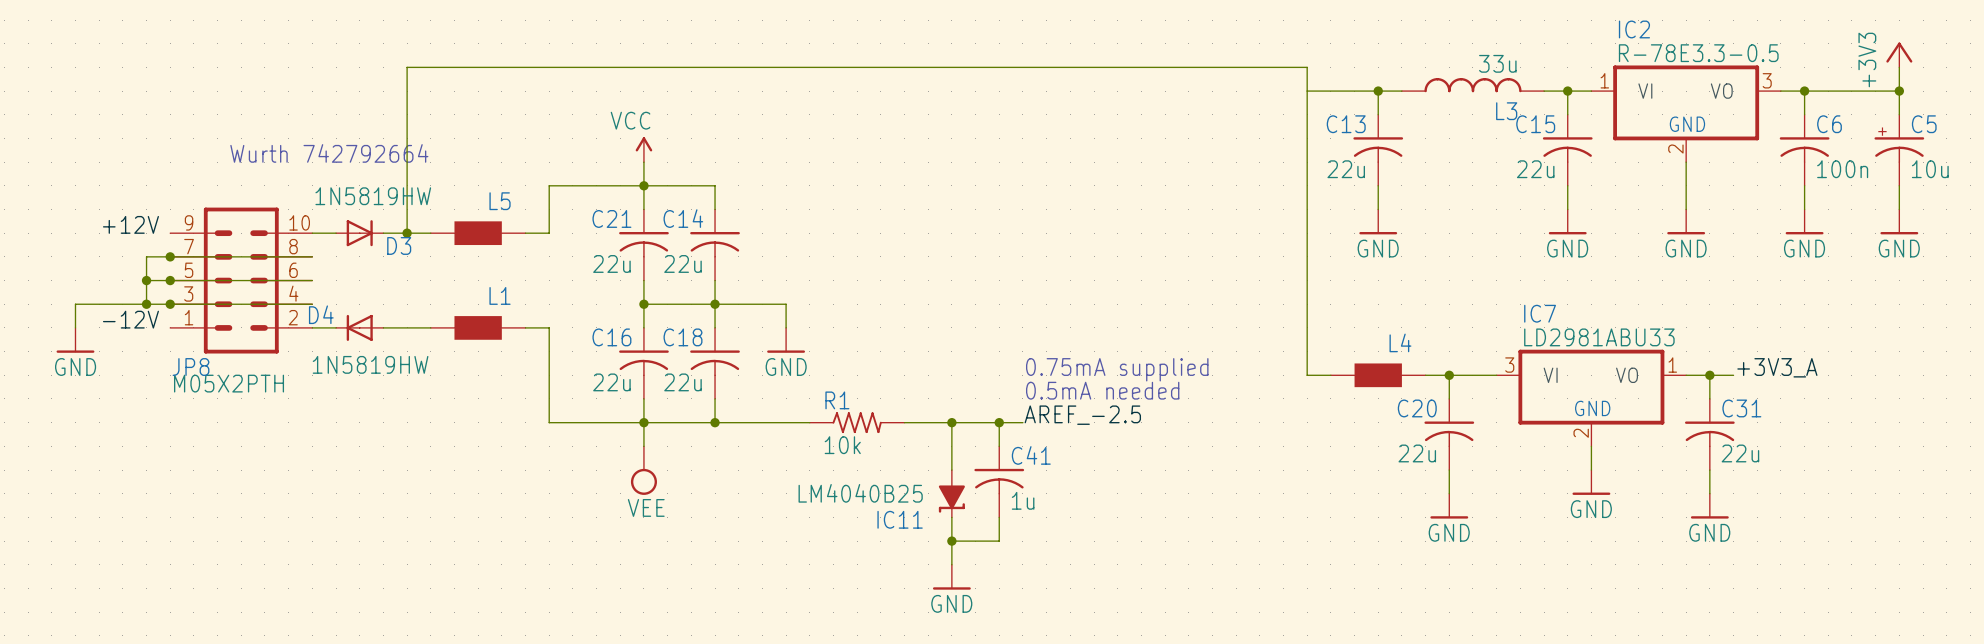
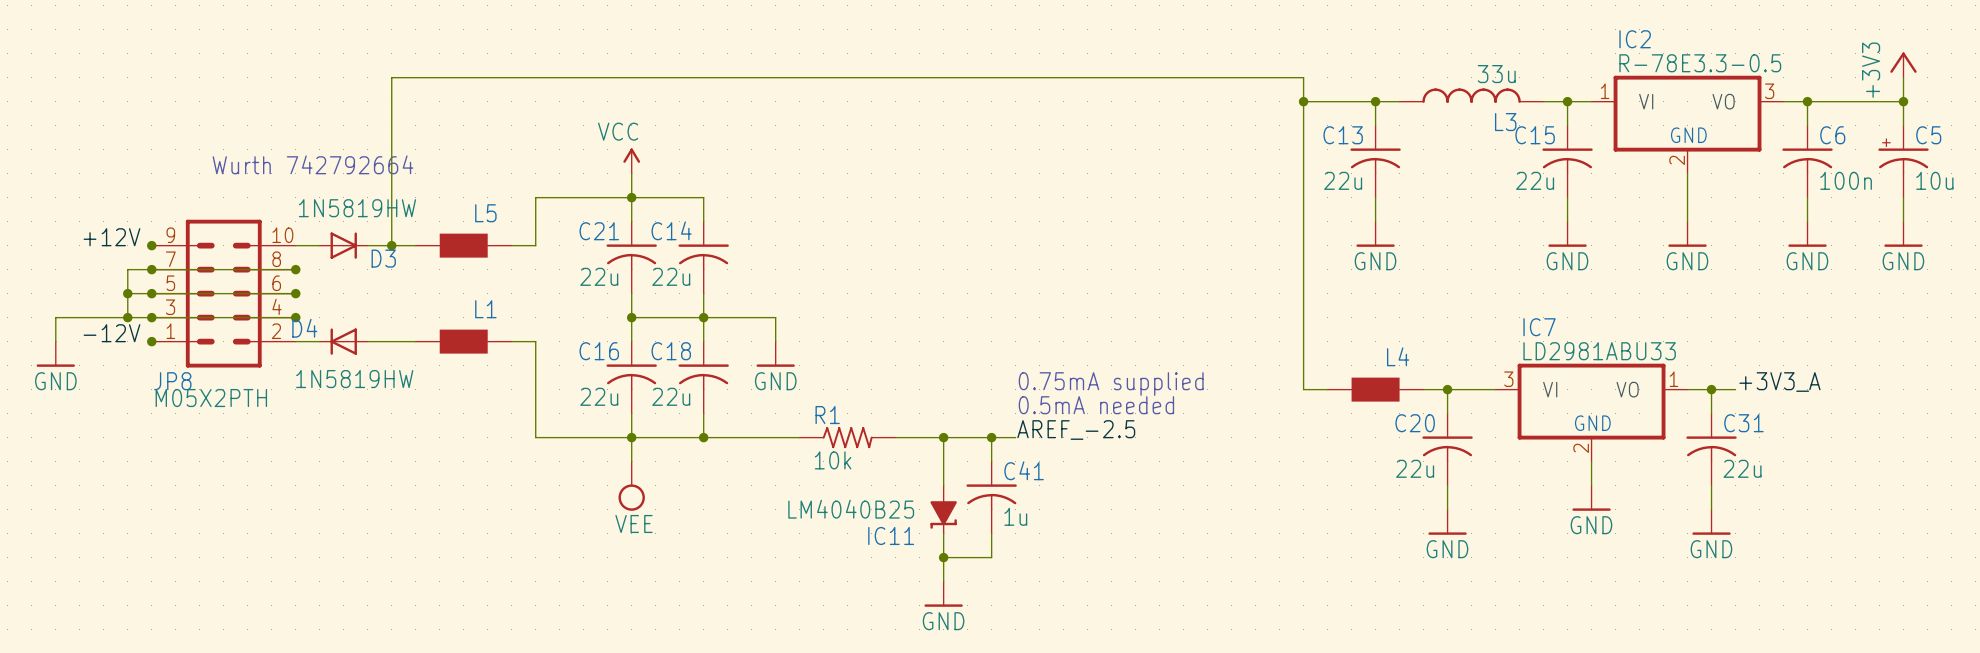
junction: none -> (1303, 101)
junction: none -> (151, 245)
junction: none -> (295, 269)
junction: none -> (295, 293)
junction: none -> (295, 317)
junction: none -> (151, 341)

